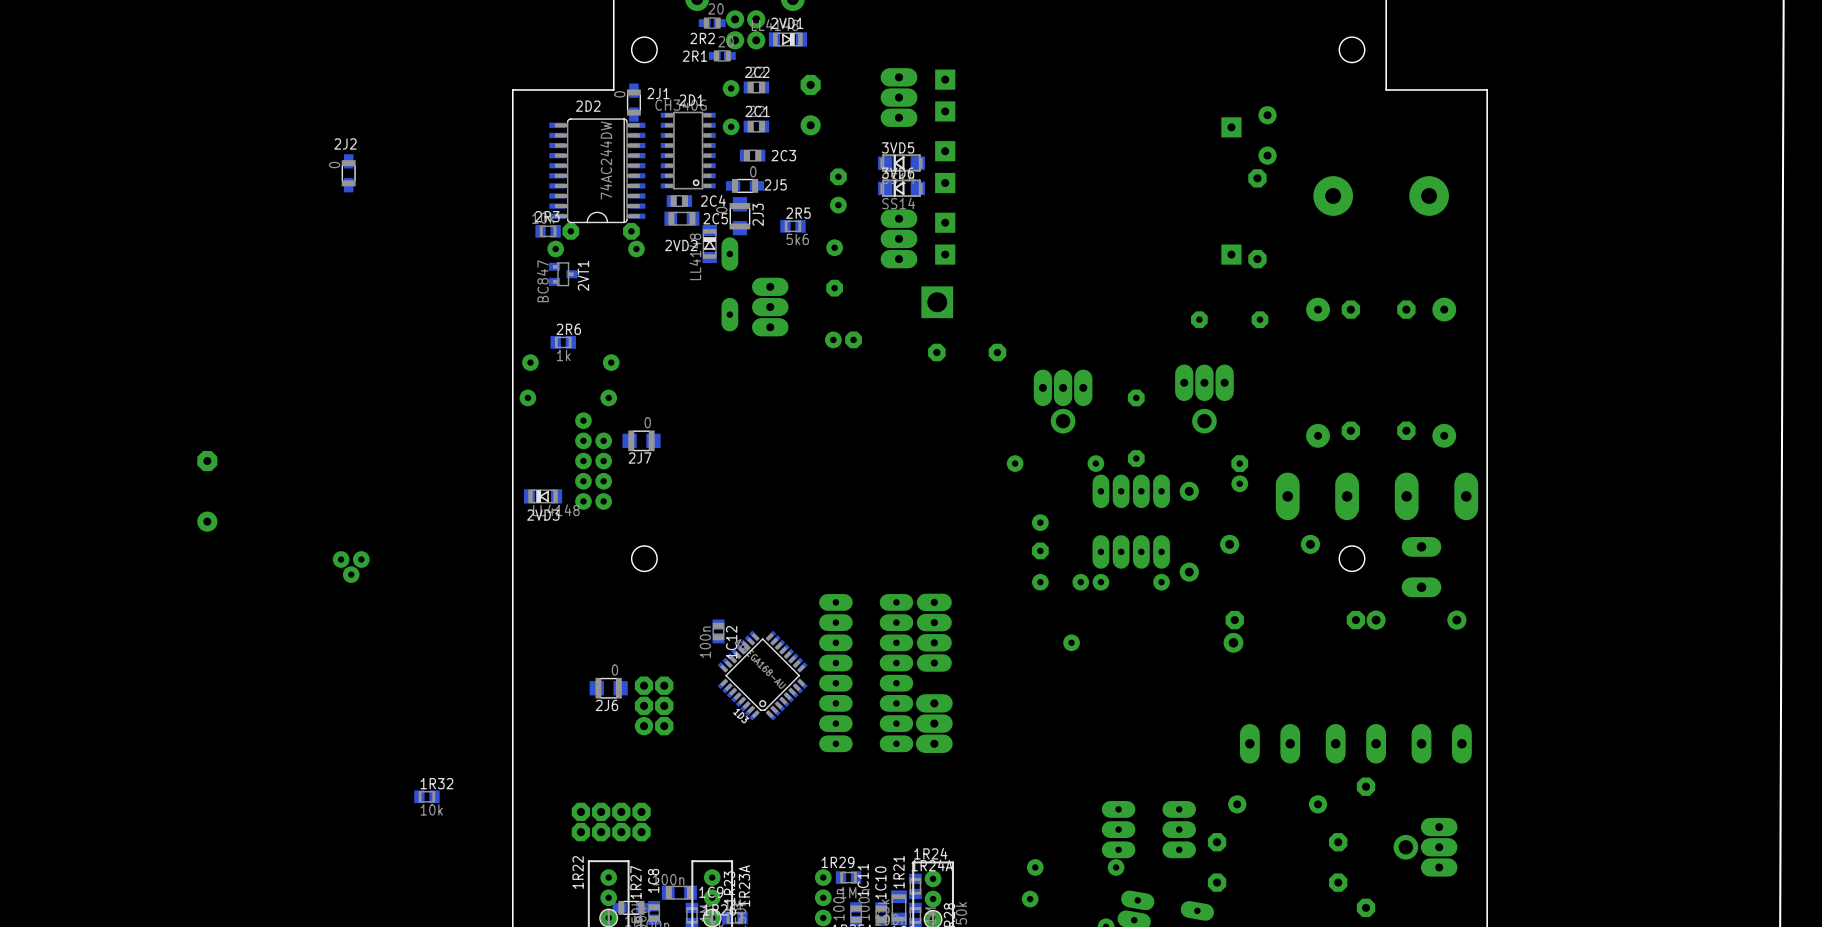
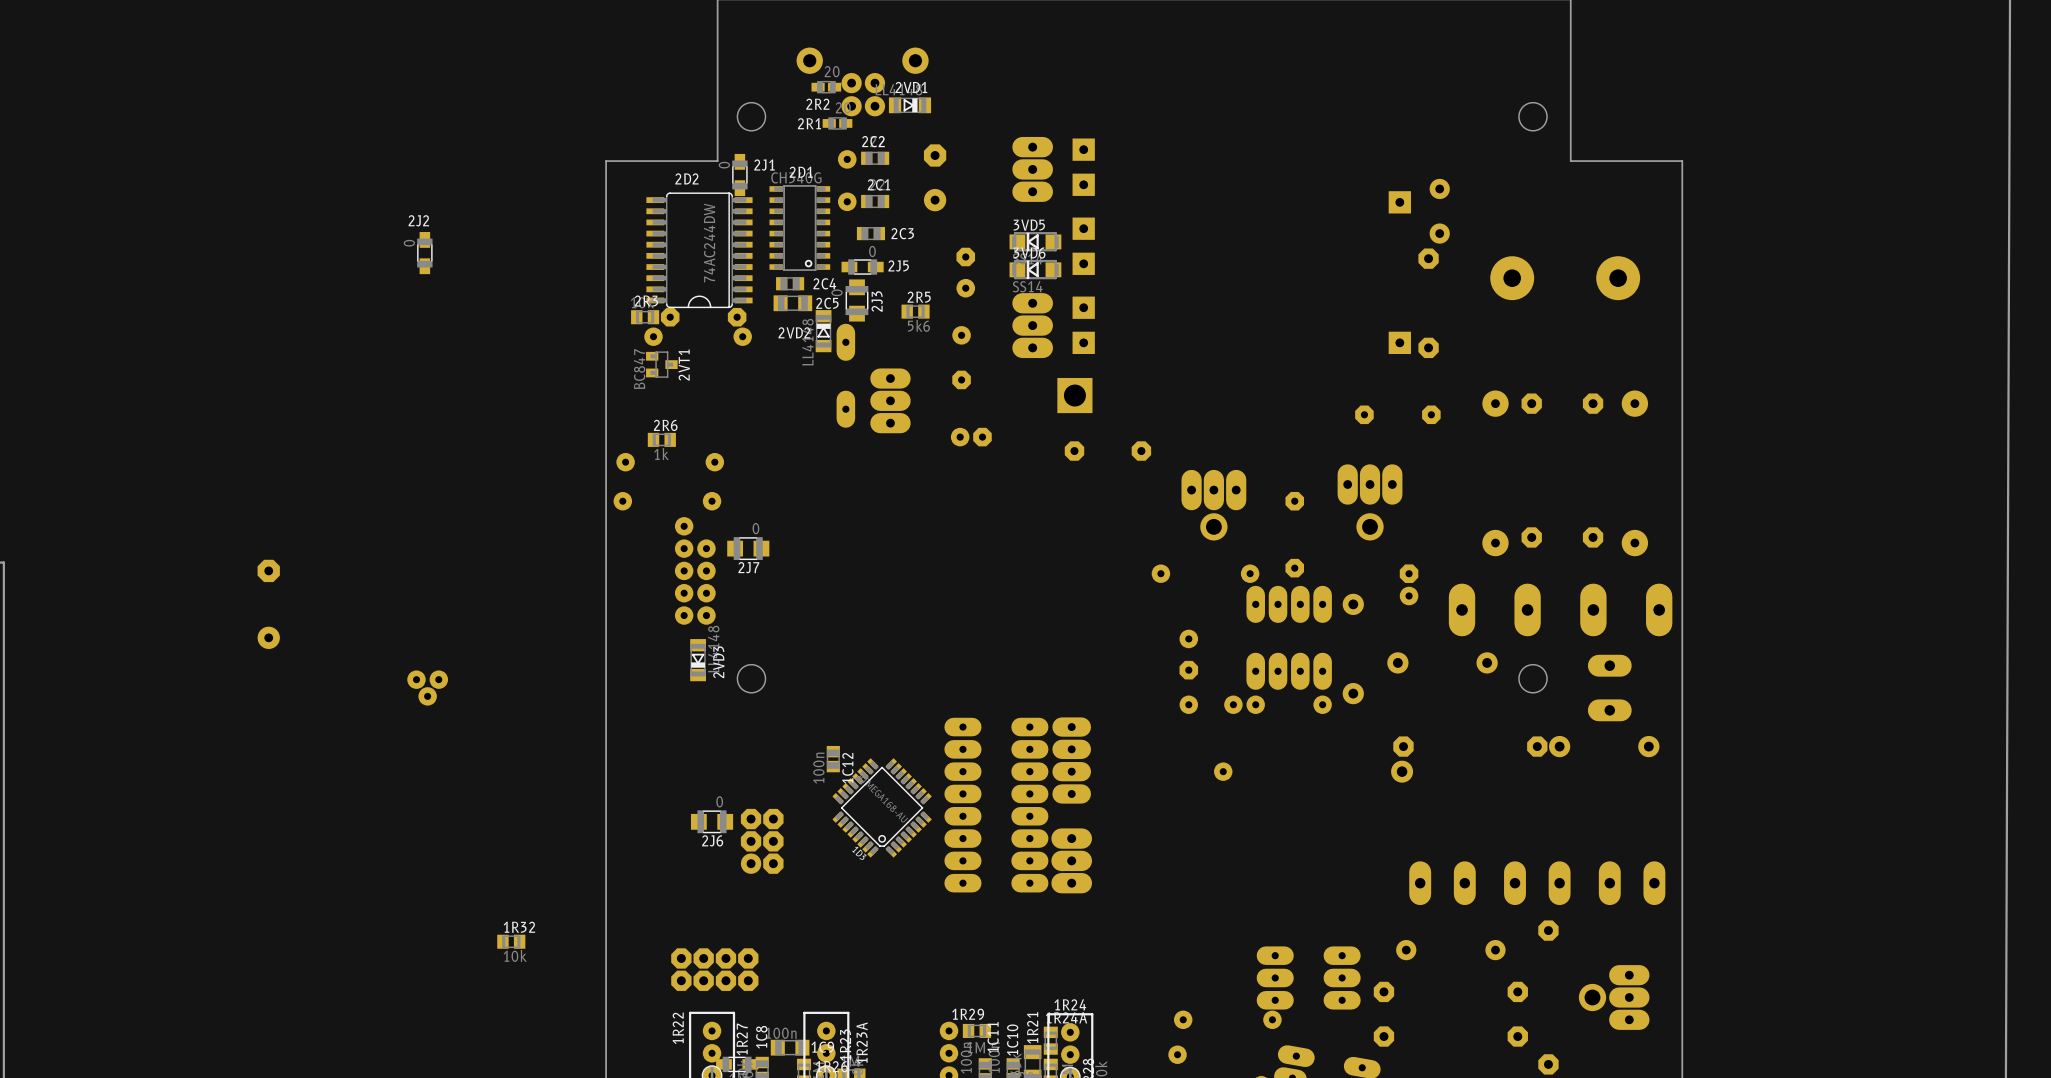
2VD3 rotation: 0° (543, 496) -> 90° counterclockwise (698, 660)
2VD3 position: (543, 496) -> (698, 660)

